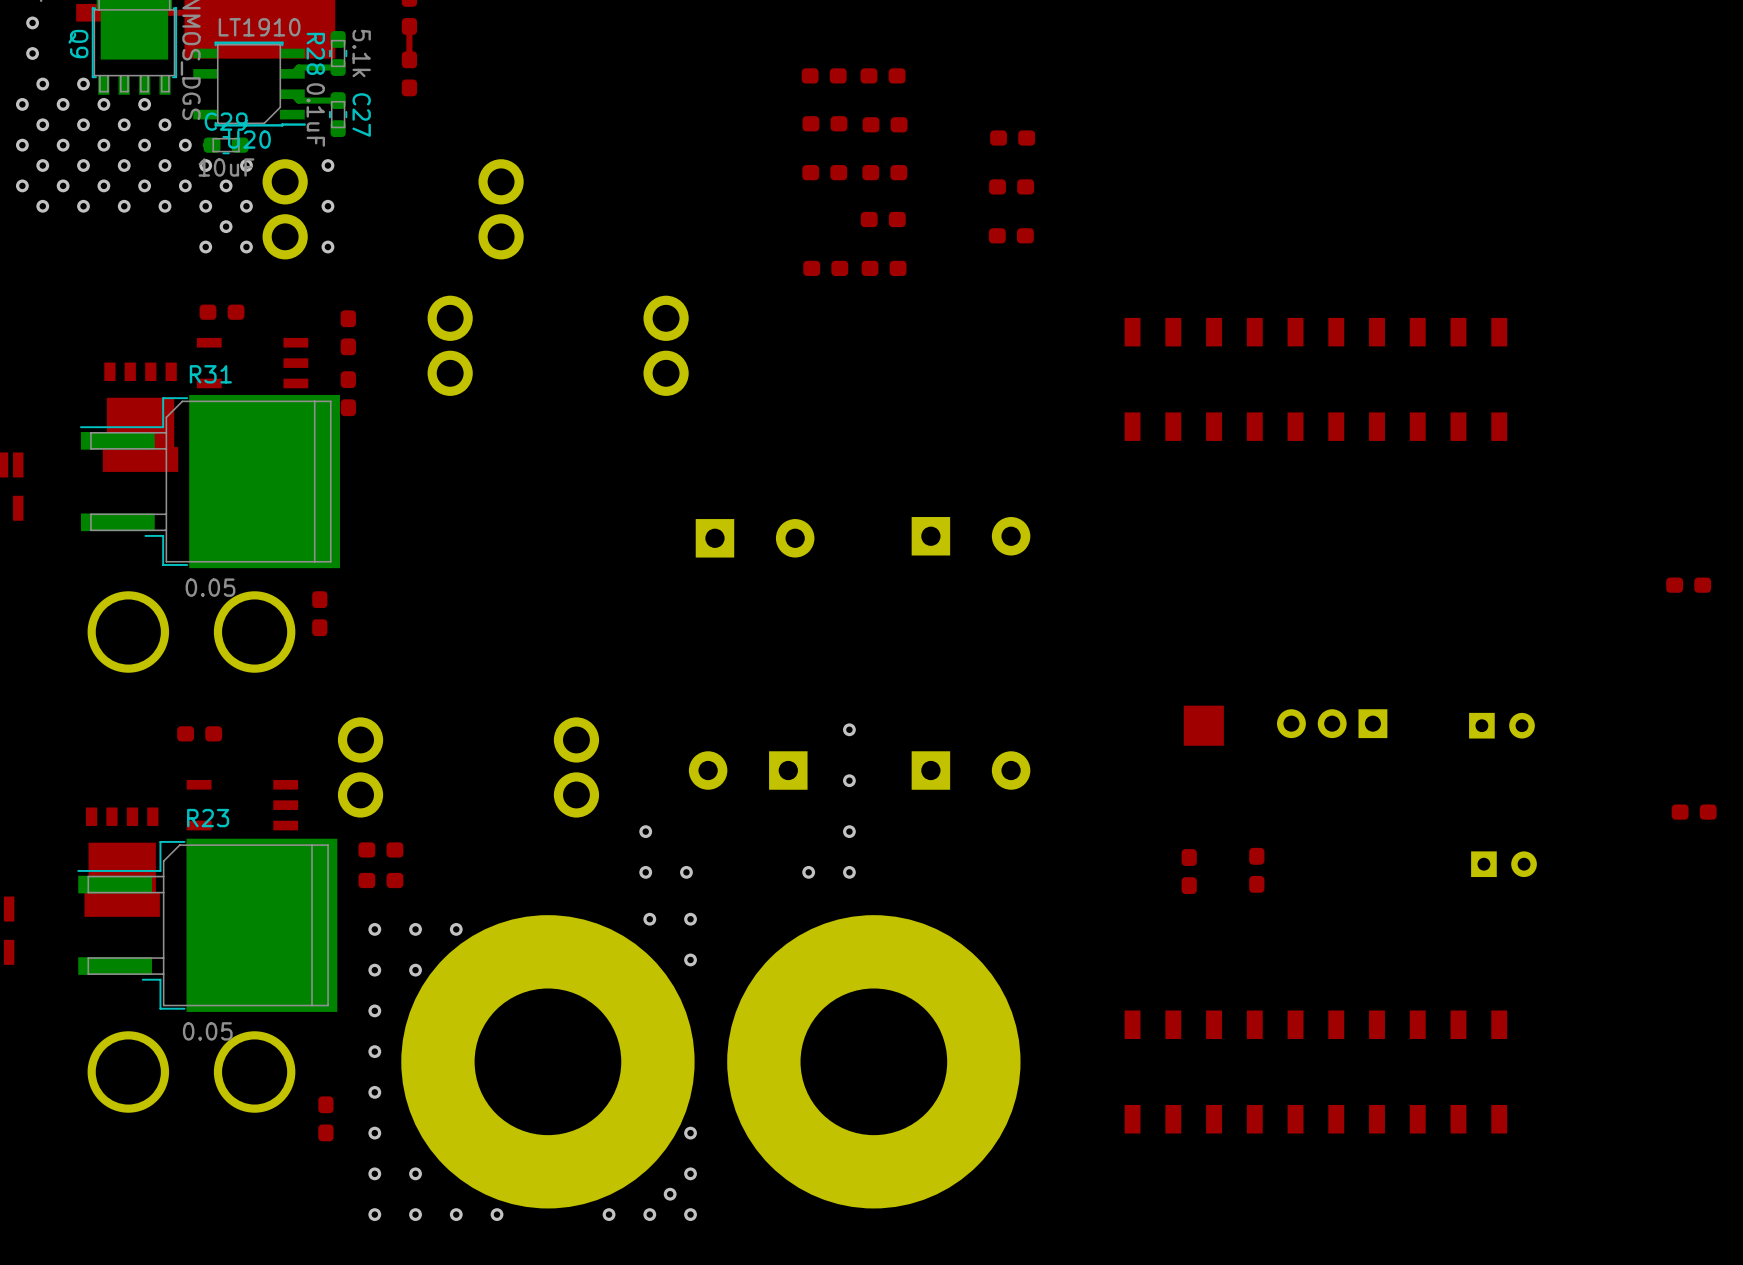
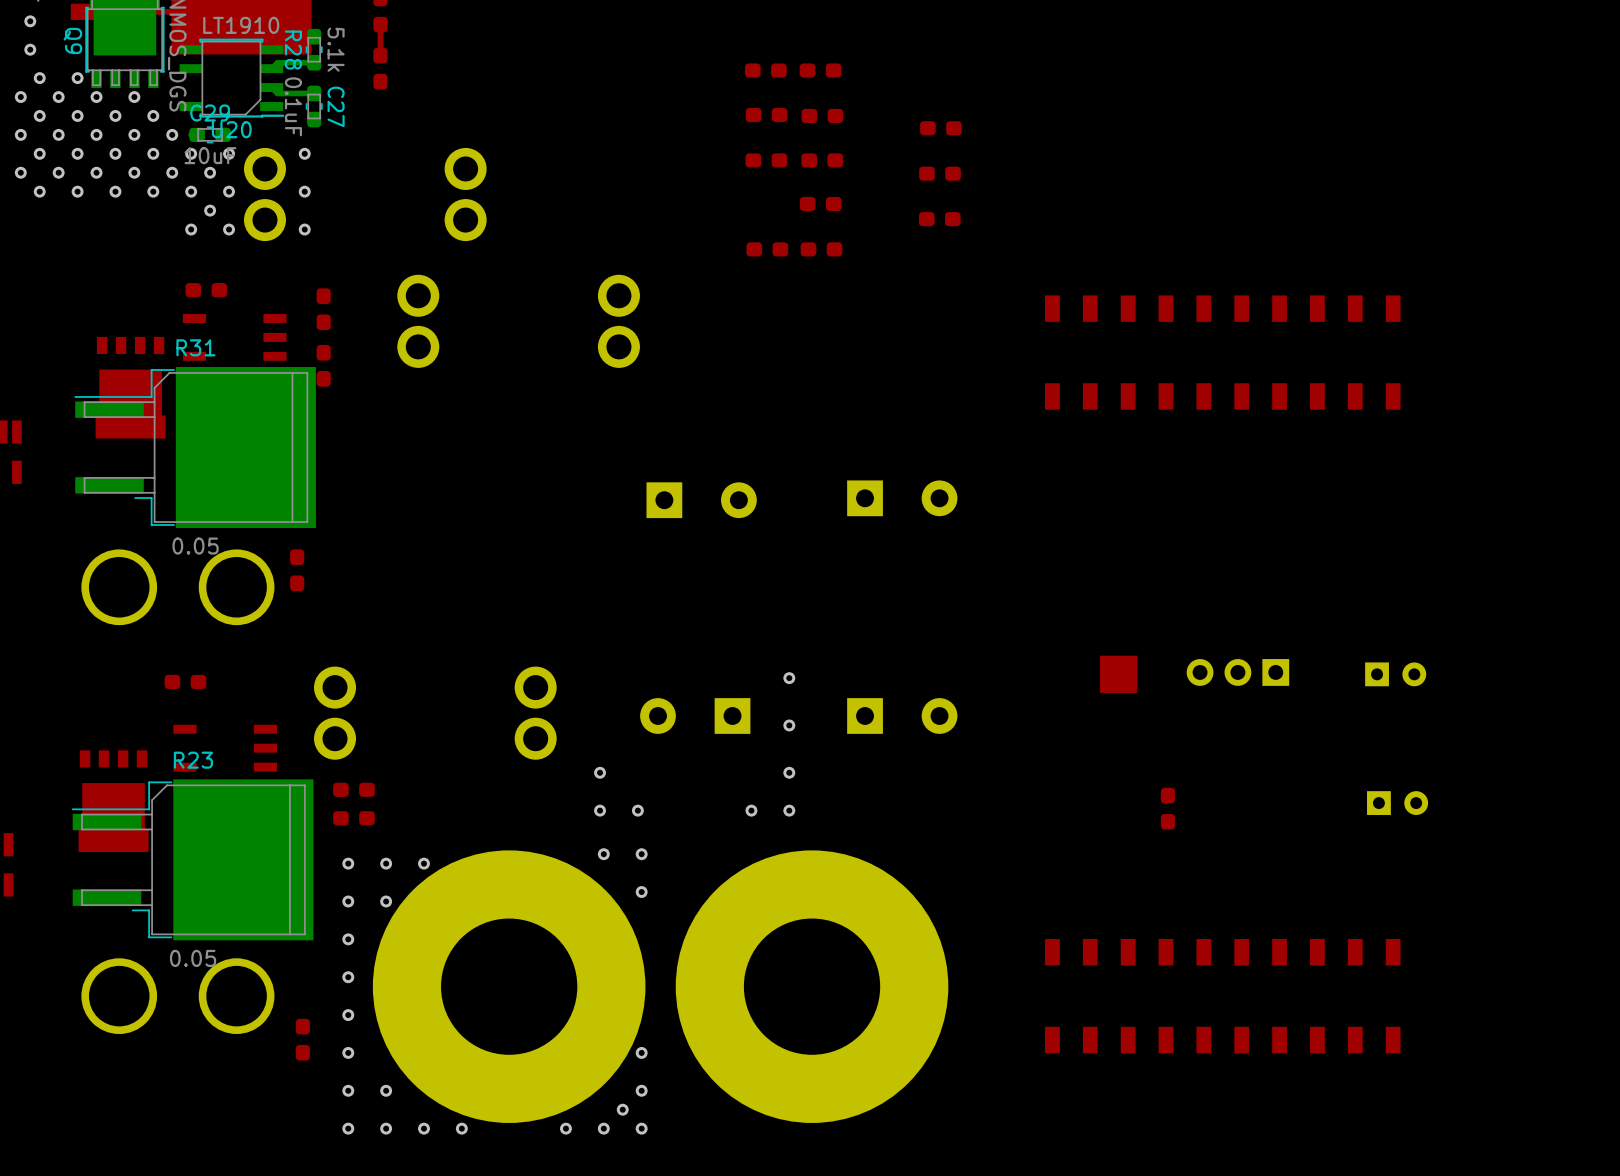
part: (1688, 585) -> none
part: (1694, 812) -> none
part: (1189, 871) -> none

